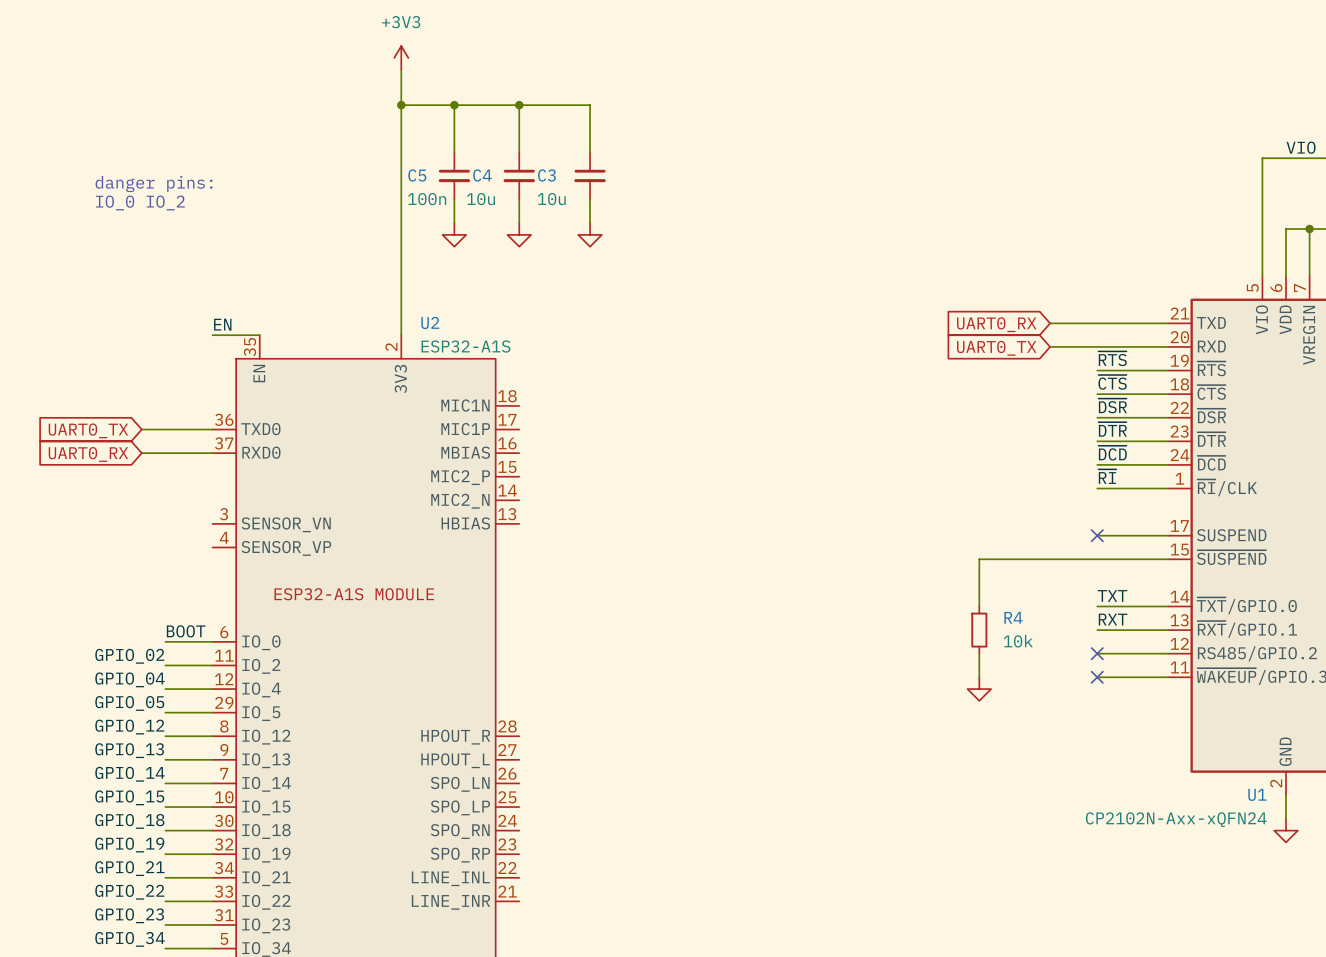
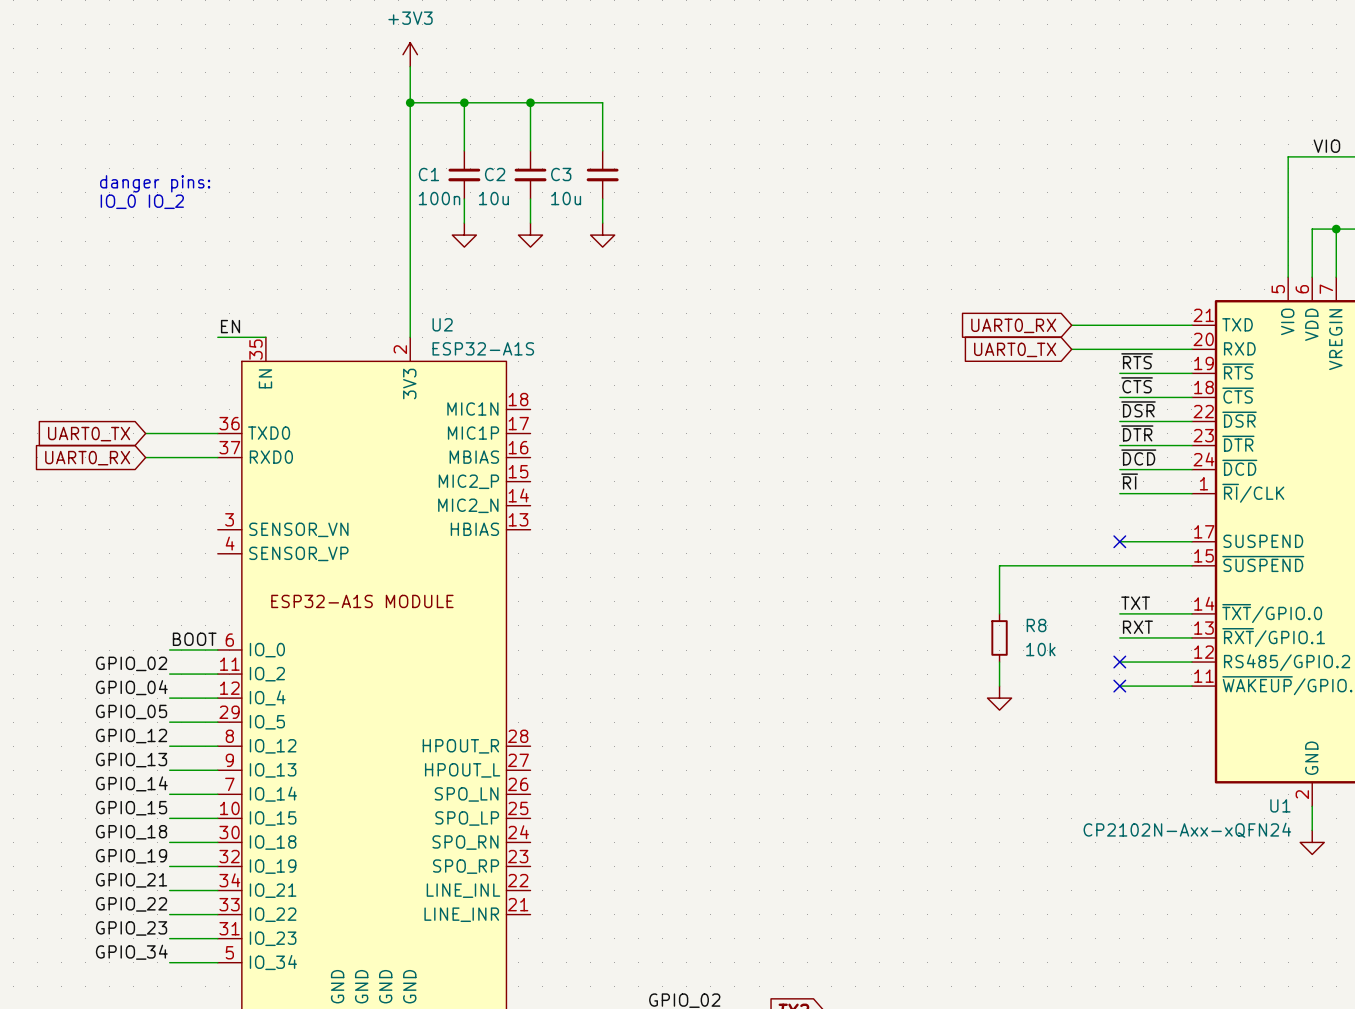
C5 name: C5 (417, 175) -> C1 (428, 174)
C4 name: C4 (482, 175) -> C2 (495, 174)
R4 name: R4 (1013, 617) -> R8 (1036, 625)

